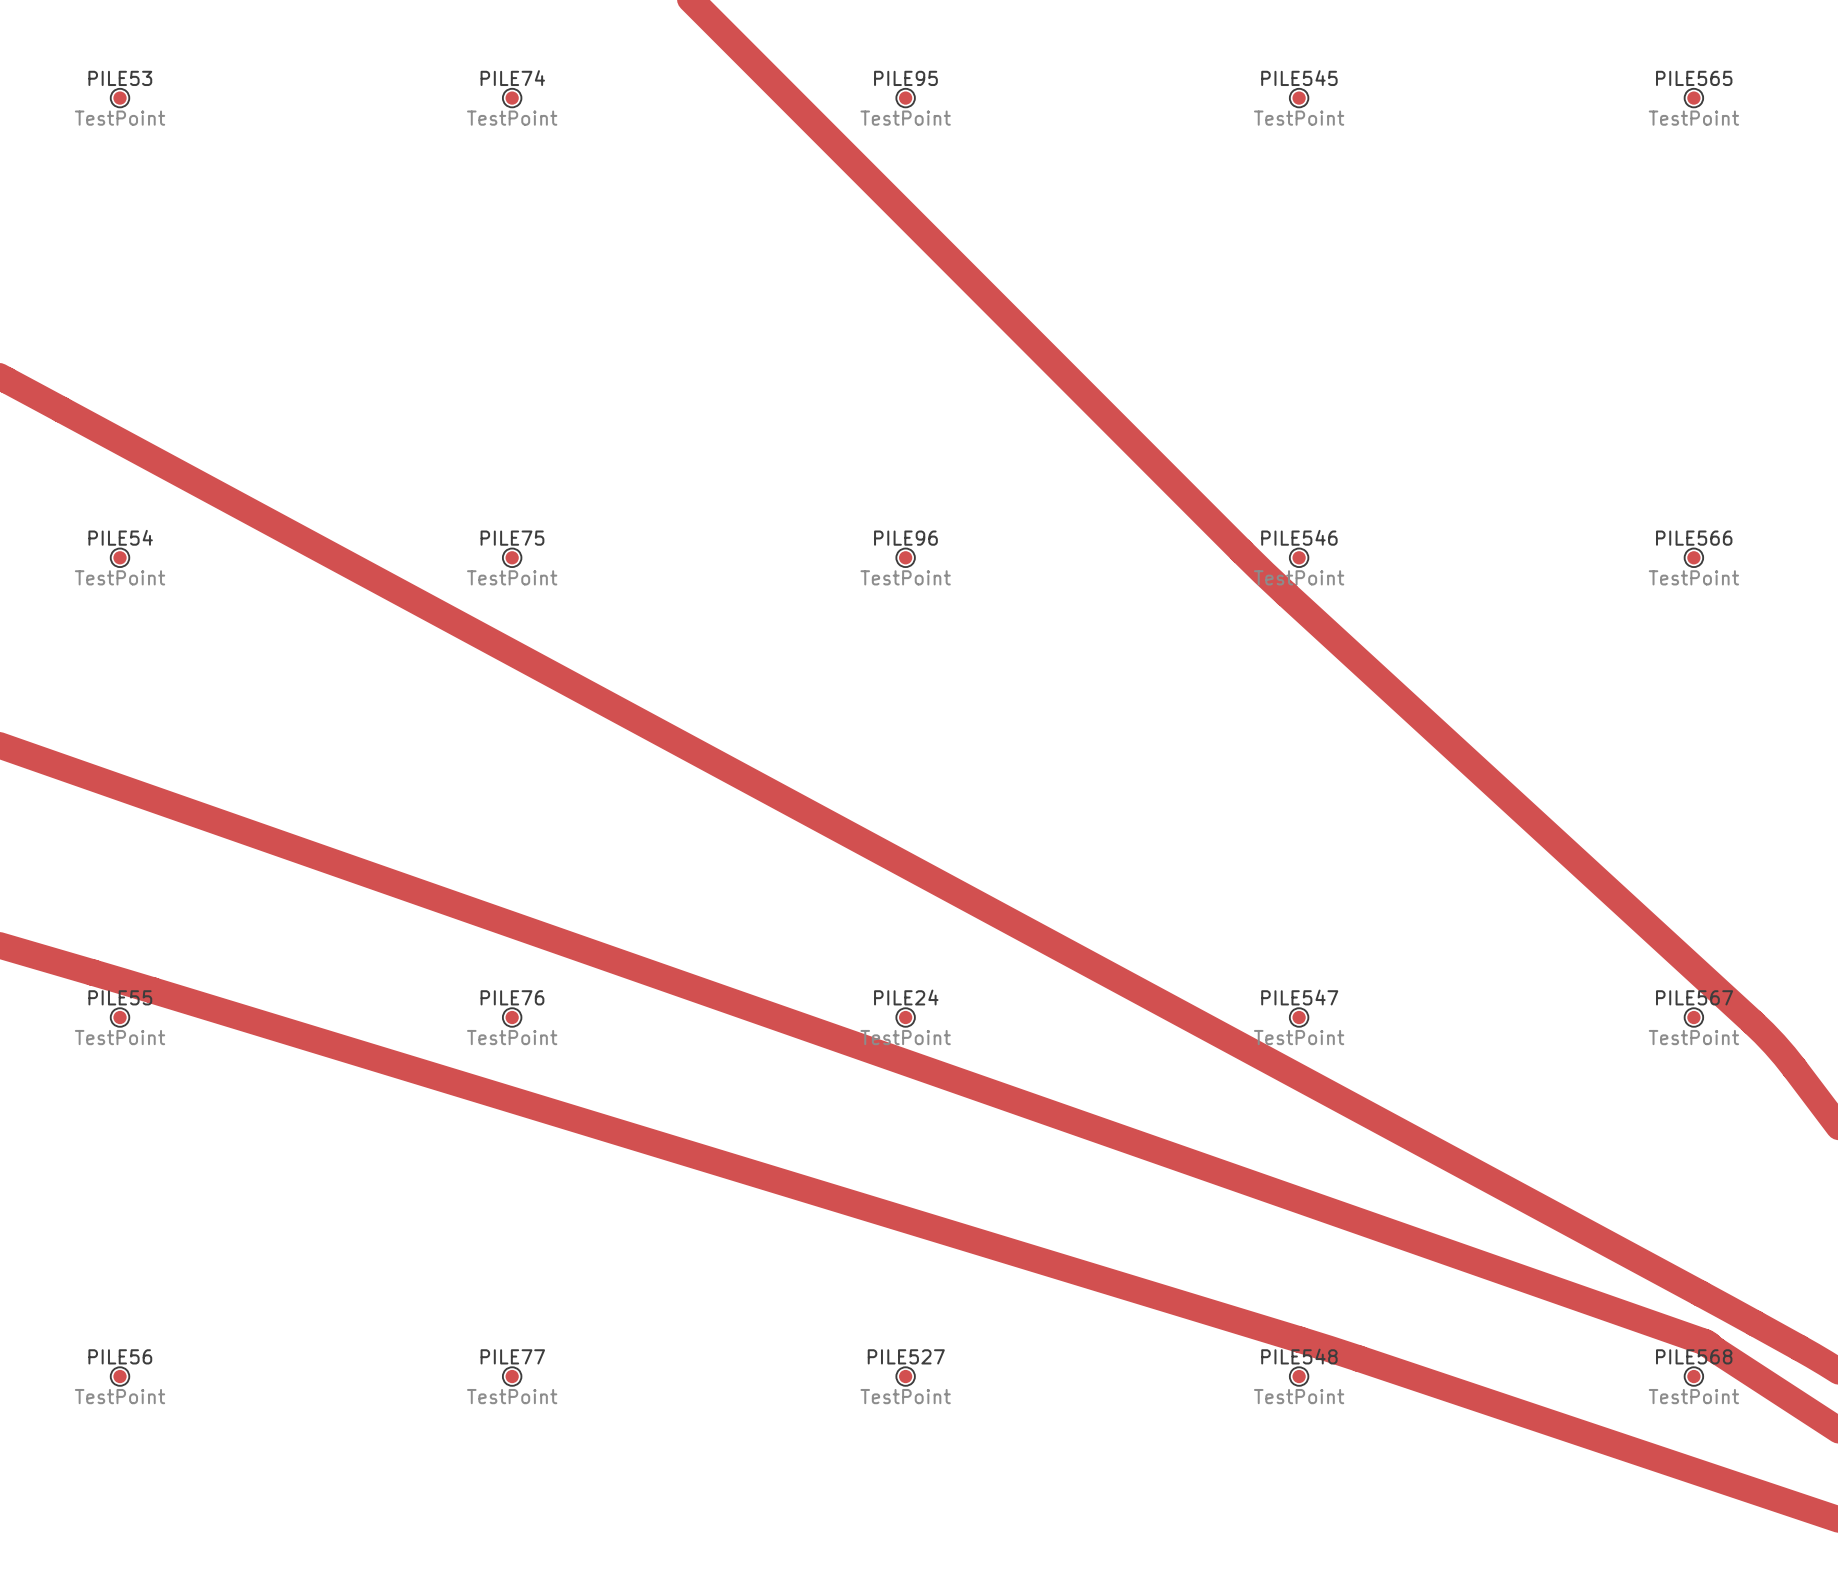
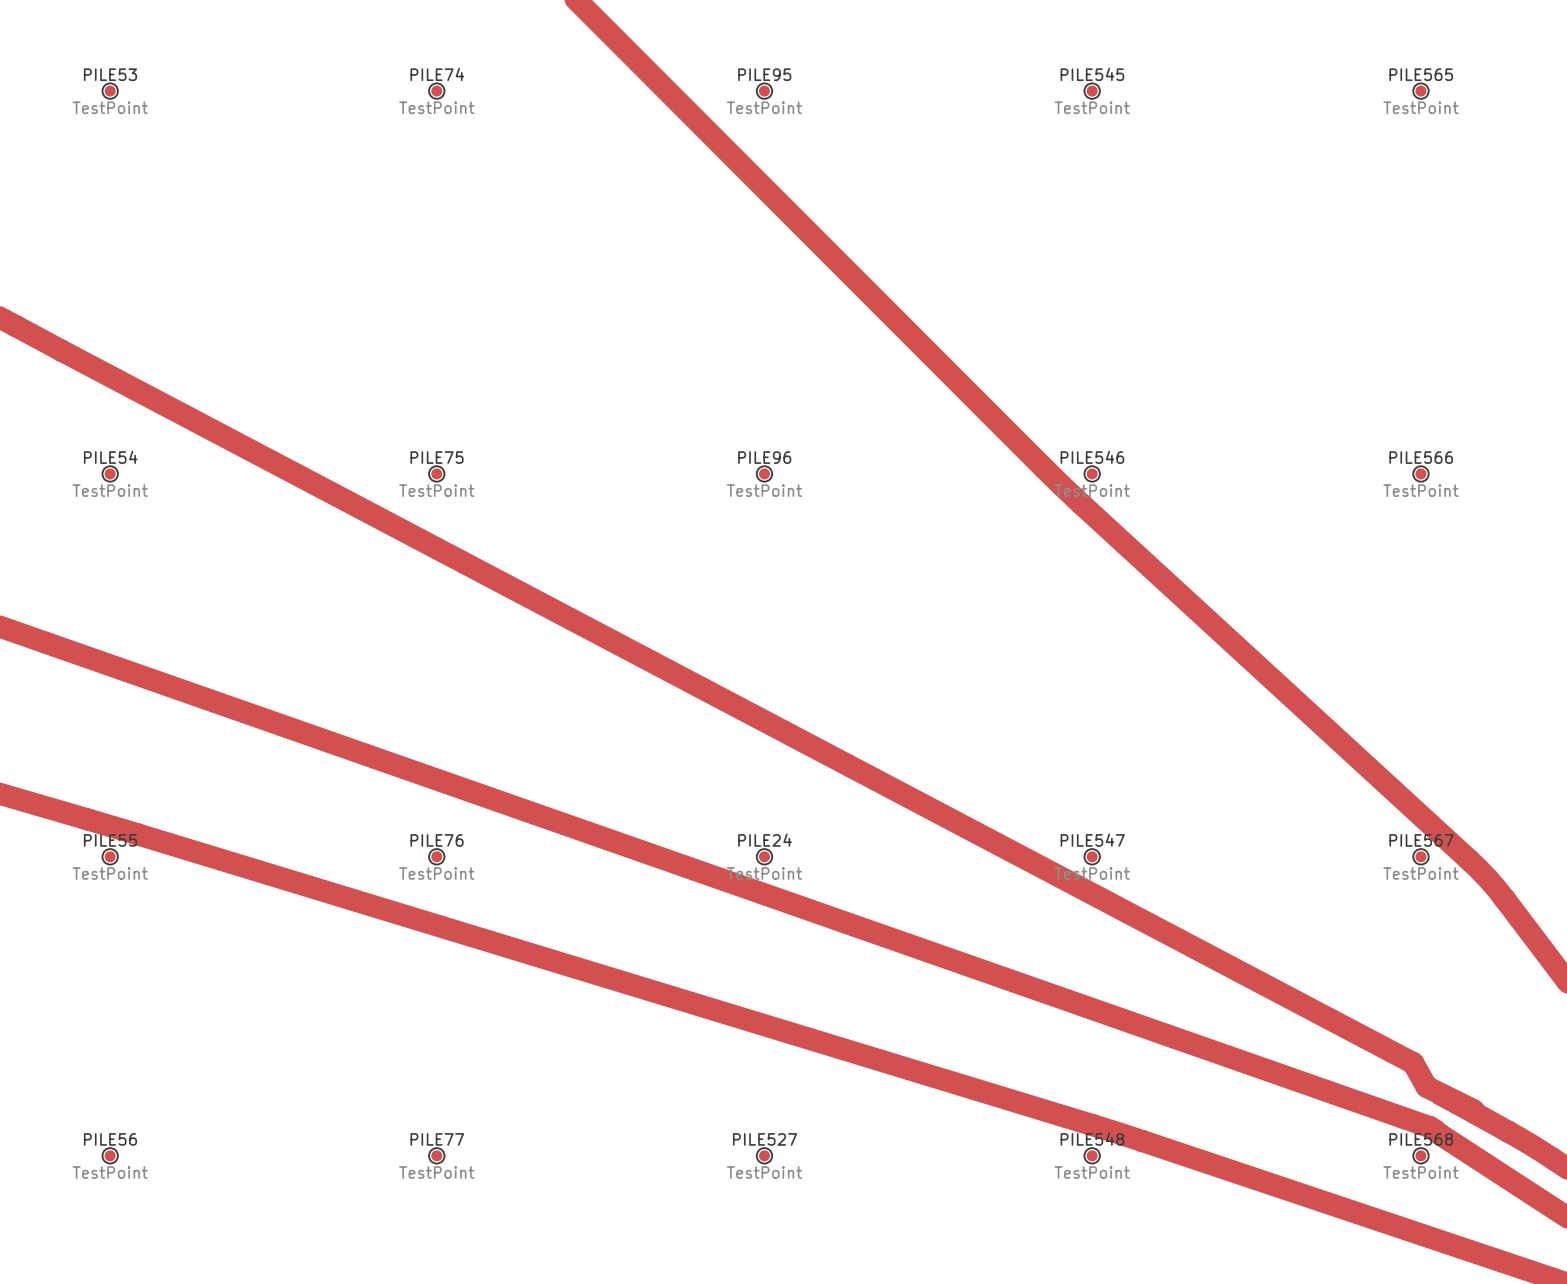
track: (61, 409) (1755, 1323) -> (61, 350) (1413, 1063) (1426, 1086) (1473, 1110) (1440, 1094) (1471, 1111)

